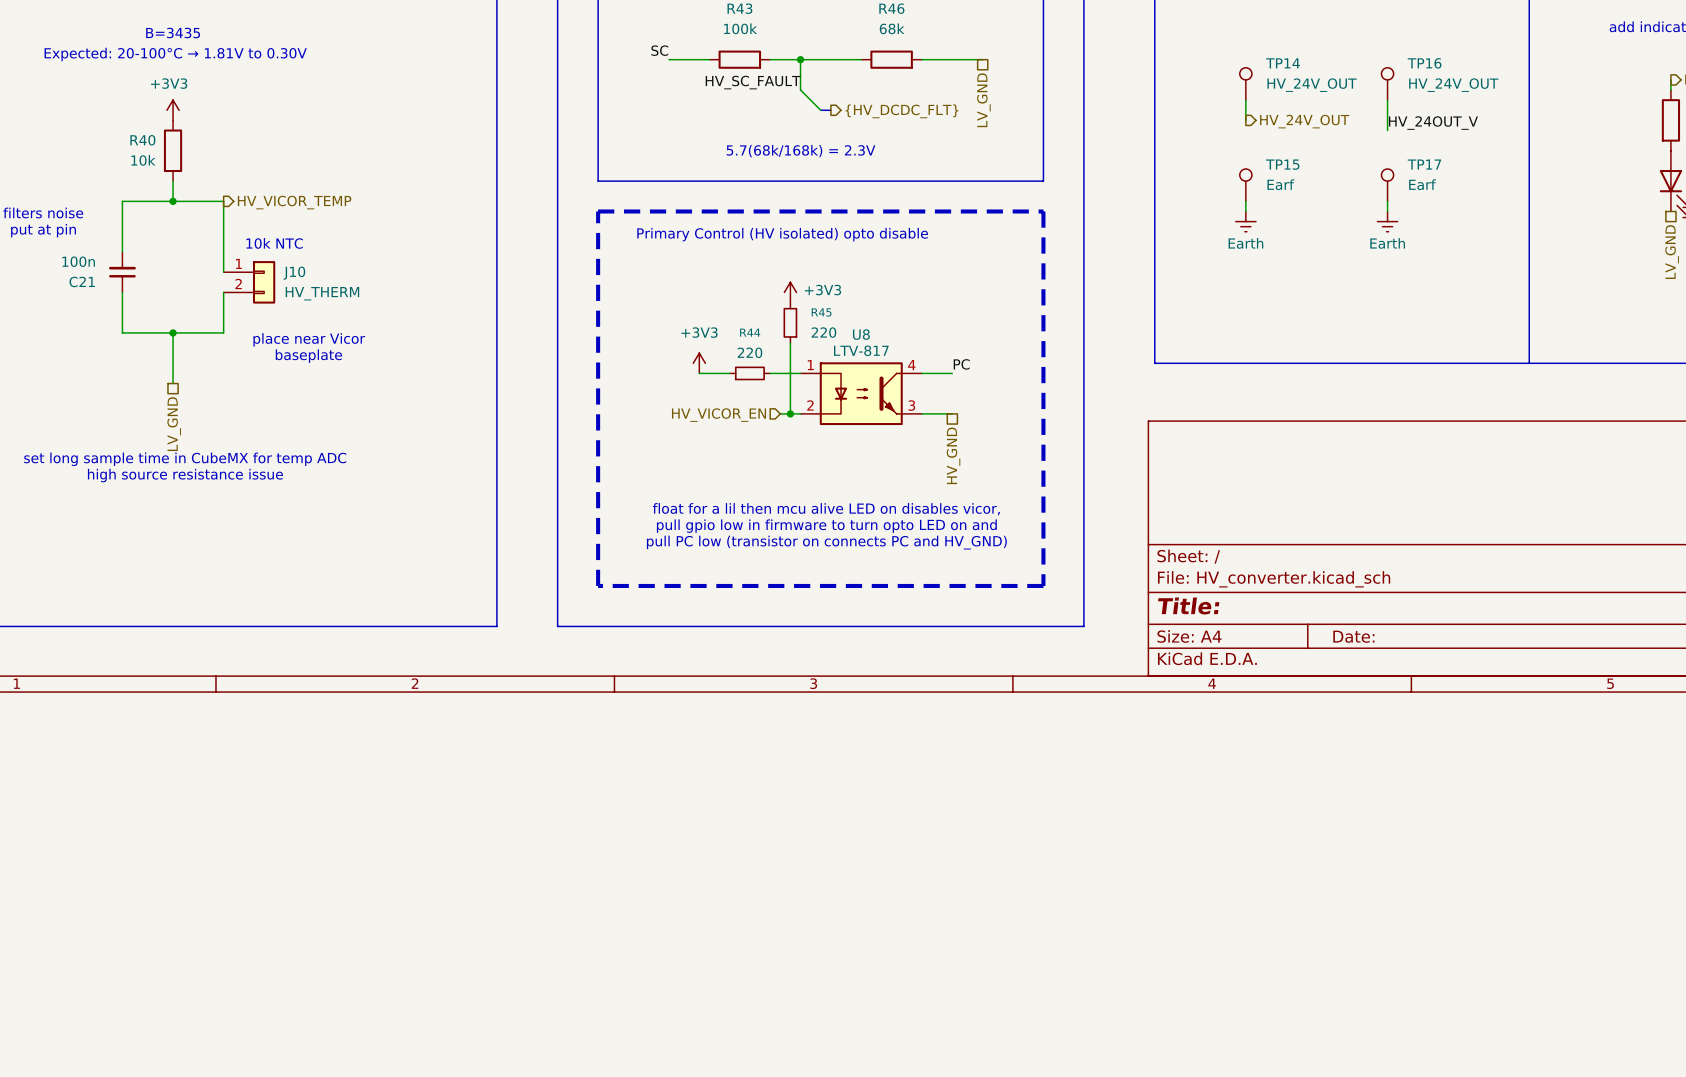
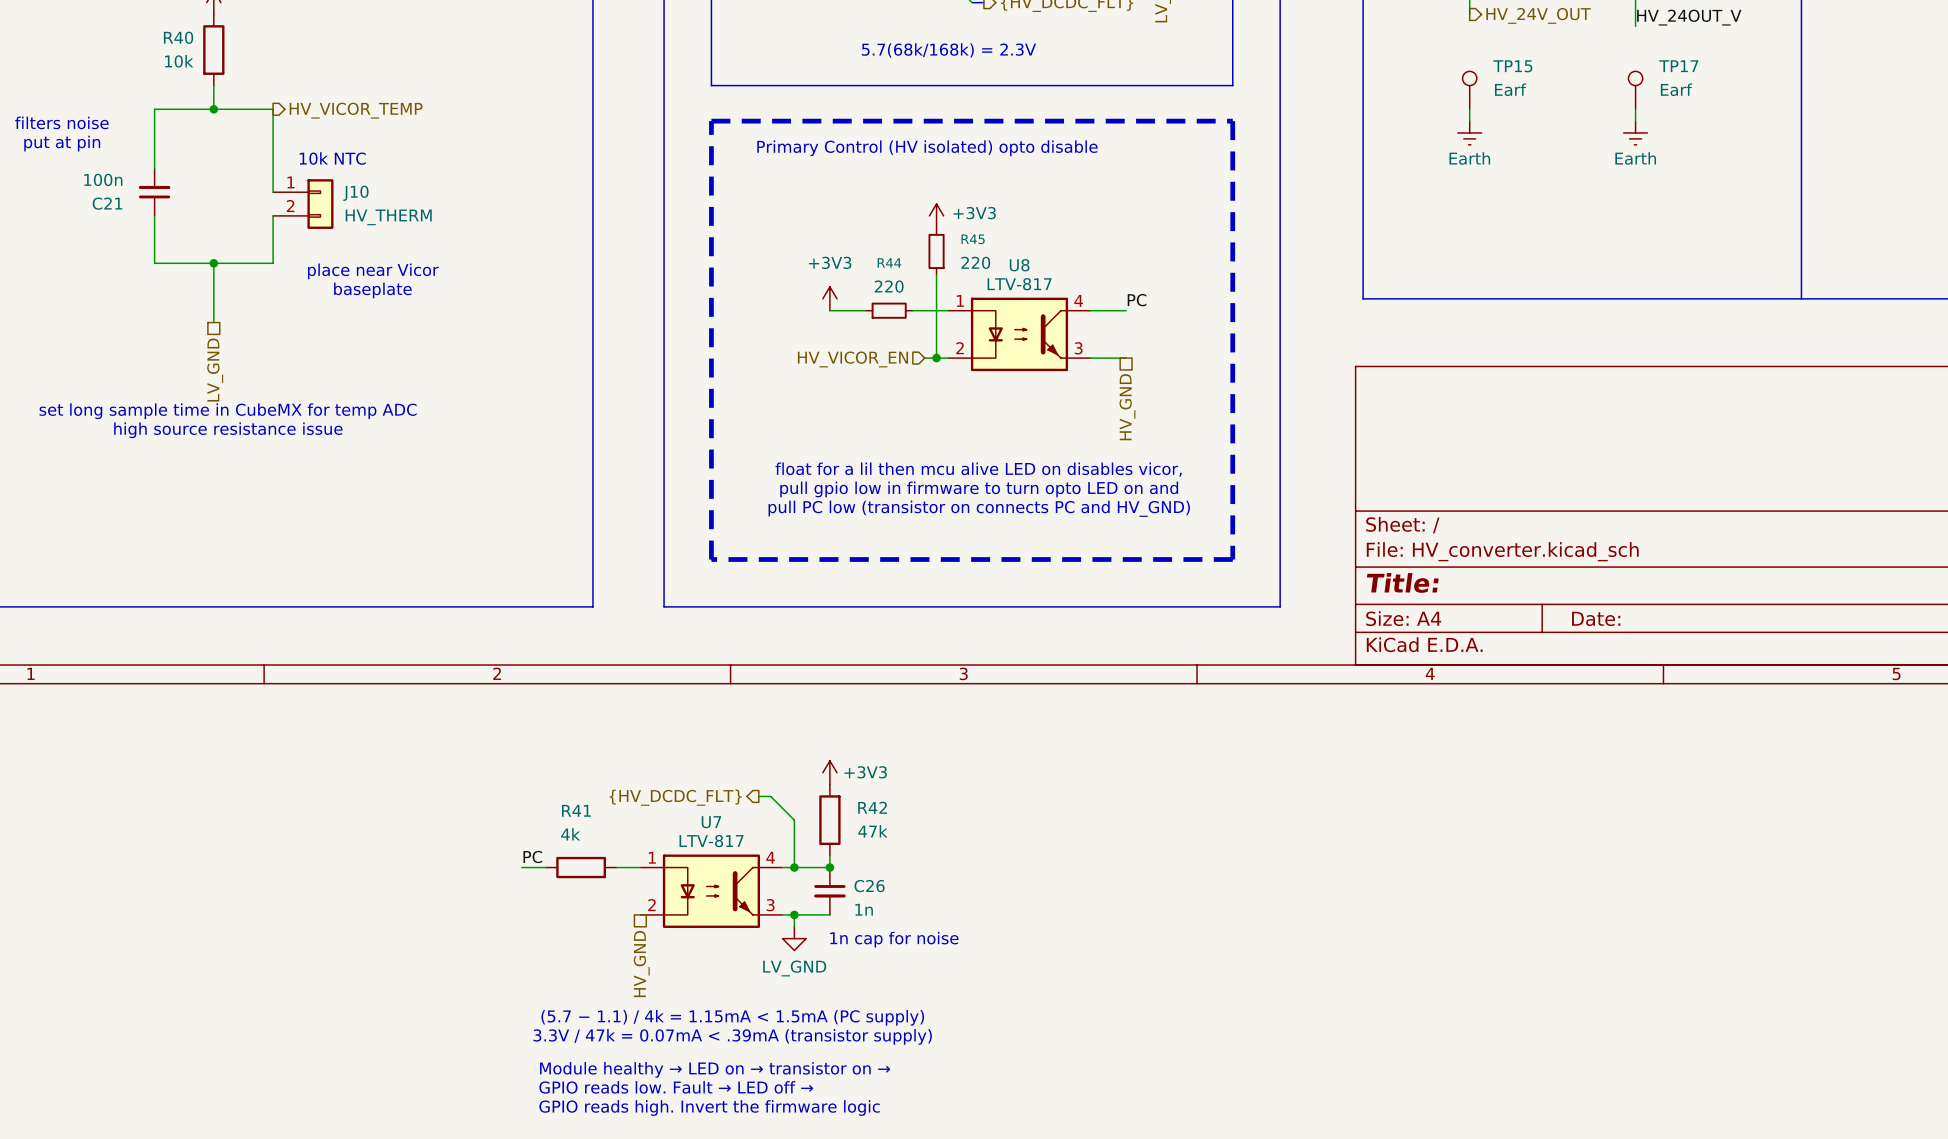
power symbol: none -> +3V3 (829, 772)
wire: none -> (758, 796) (770, 796) (794, 820) (794, 867)
hierarchical label: none -> {HV_DCDC_FLT} (675, 797)
R42: none -> 47k (829, 820)
wire: none -> (829, 855) (829, 867) (782, 867)
label: none -> PC (532, 856)
wire: none -> (521, 867) (545, 867)
R41: none -> 4k (581, 867)
wire: none -> (616, 867) (640, 867)
junction: none -> (794, 867)
junction: none -> (829, 867)
U7: none -> LTV-817 (711, 891)
C26: none -> 1n (829, 891)
wire: none -> (782, 914) (829, 914)
wire: none -> (794, 914) (794, 926)
junction: none -> (794, 914)
power symbol: none -> LV_GND (794, 938)
text: none -> 1n cap for noise (894, 939)
hierarchical label: none -> HV_GND (641, 964)
text: none -> (5.7 − 1.1) / 4k = 1.15mA < 1.5mA (PC supply) (732, 1017)
text: none -> 3.3V / 47k = 0.07mA < .39mA (transistor supply) (732, 1036)
text: none -> Module healthy → LED on → transistor on → (715, 1069)
text: none -> GPIO reads low. Fault → LED off → (676, 1087)
text: none -> GPIO reads high. Invert the firmware logic (709, 1108)

